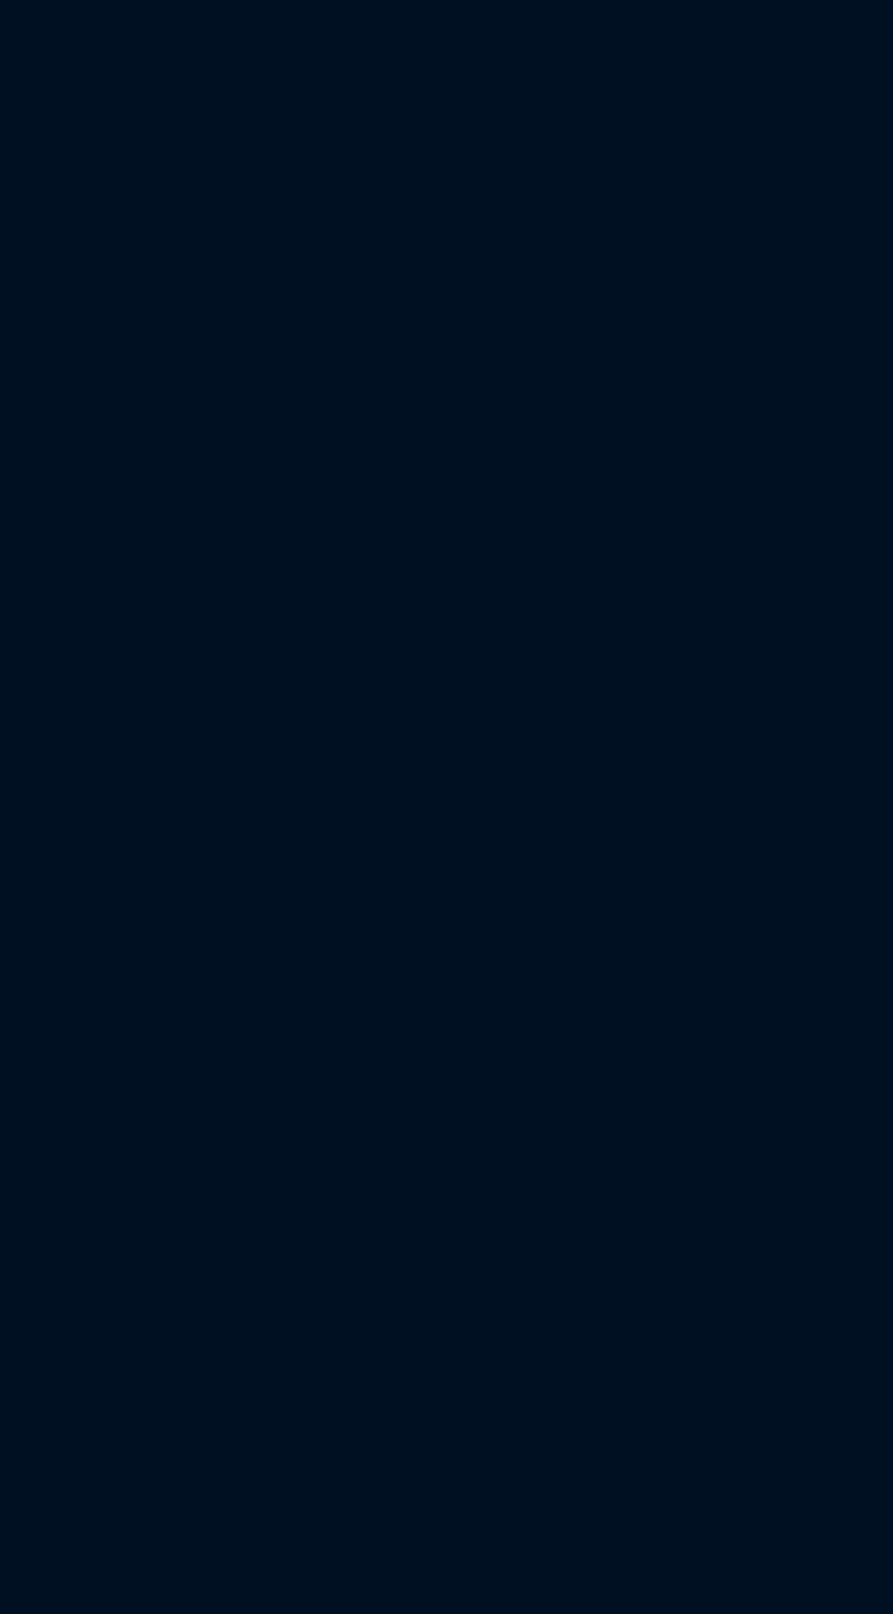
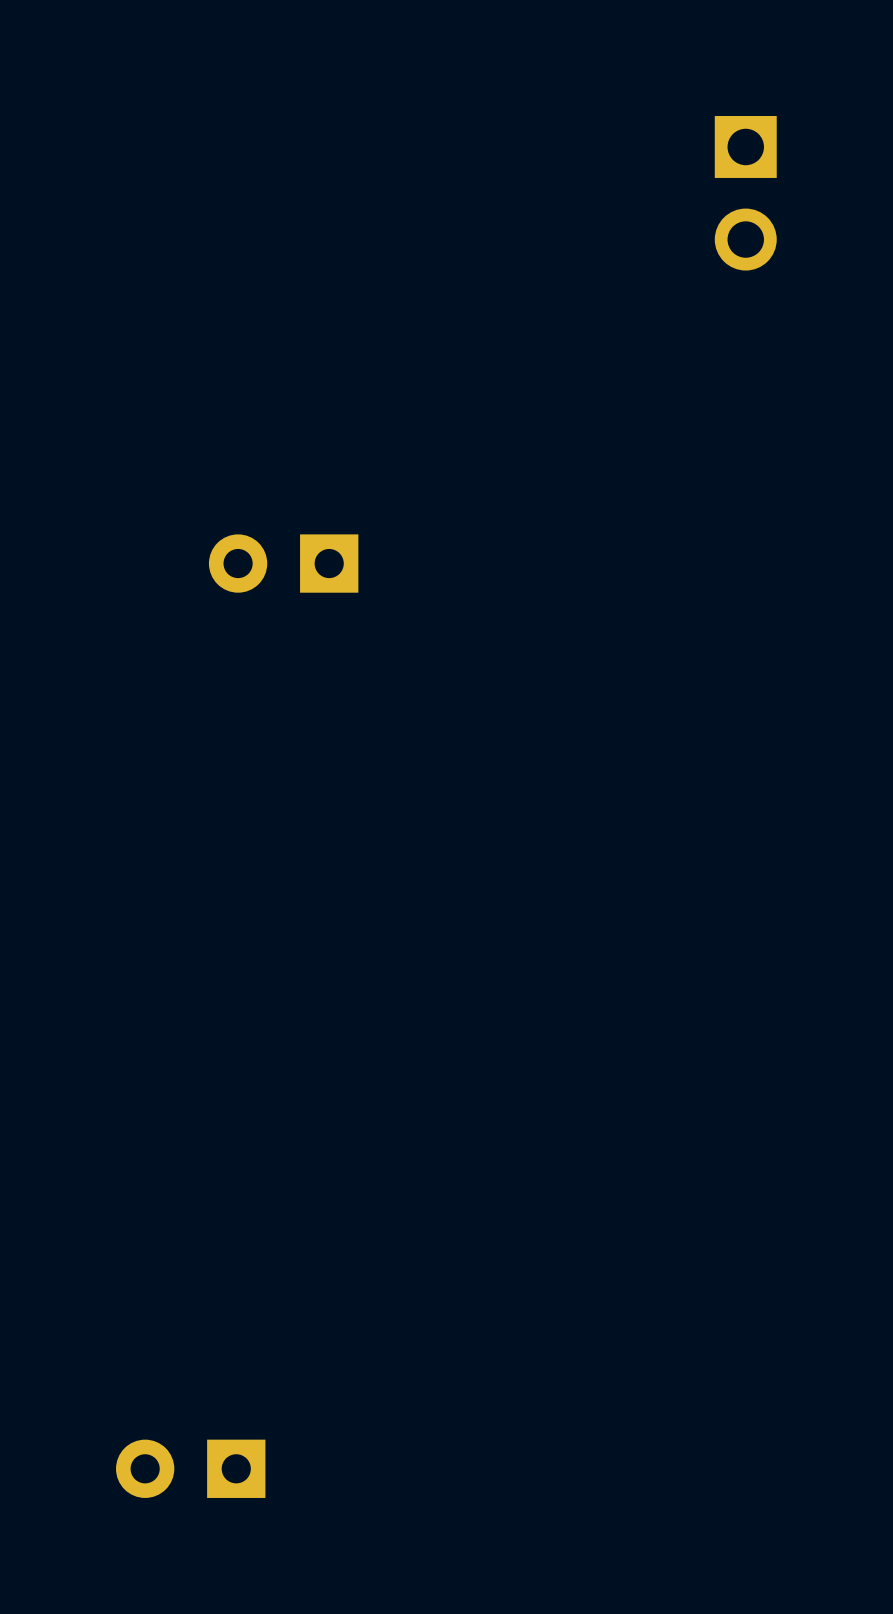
part: none -> (745, 193)
part: none -> (283, 563)
part: none -> (190, 1468)

